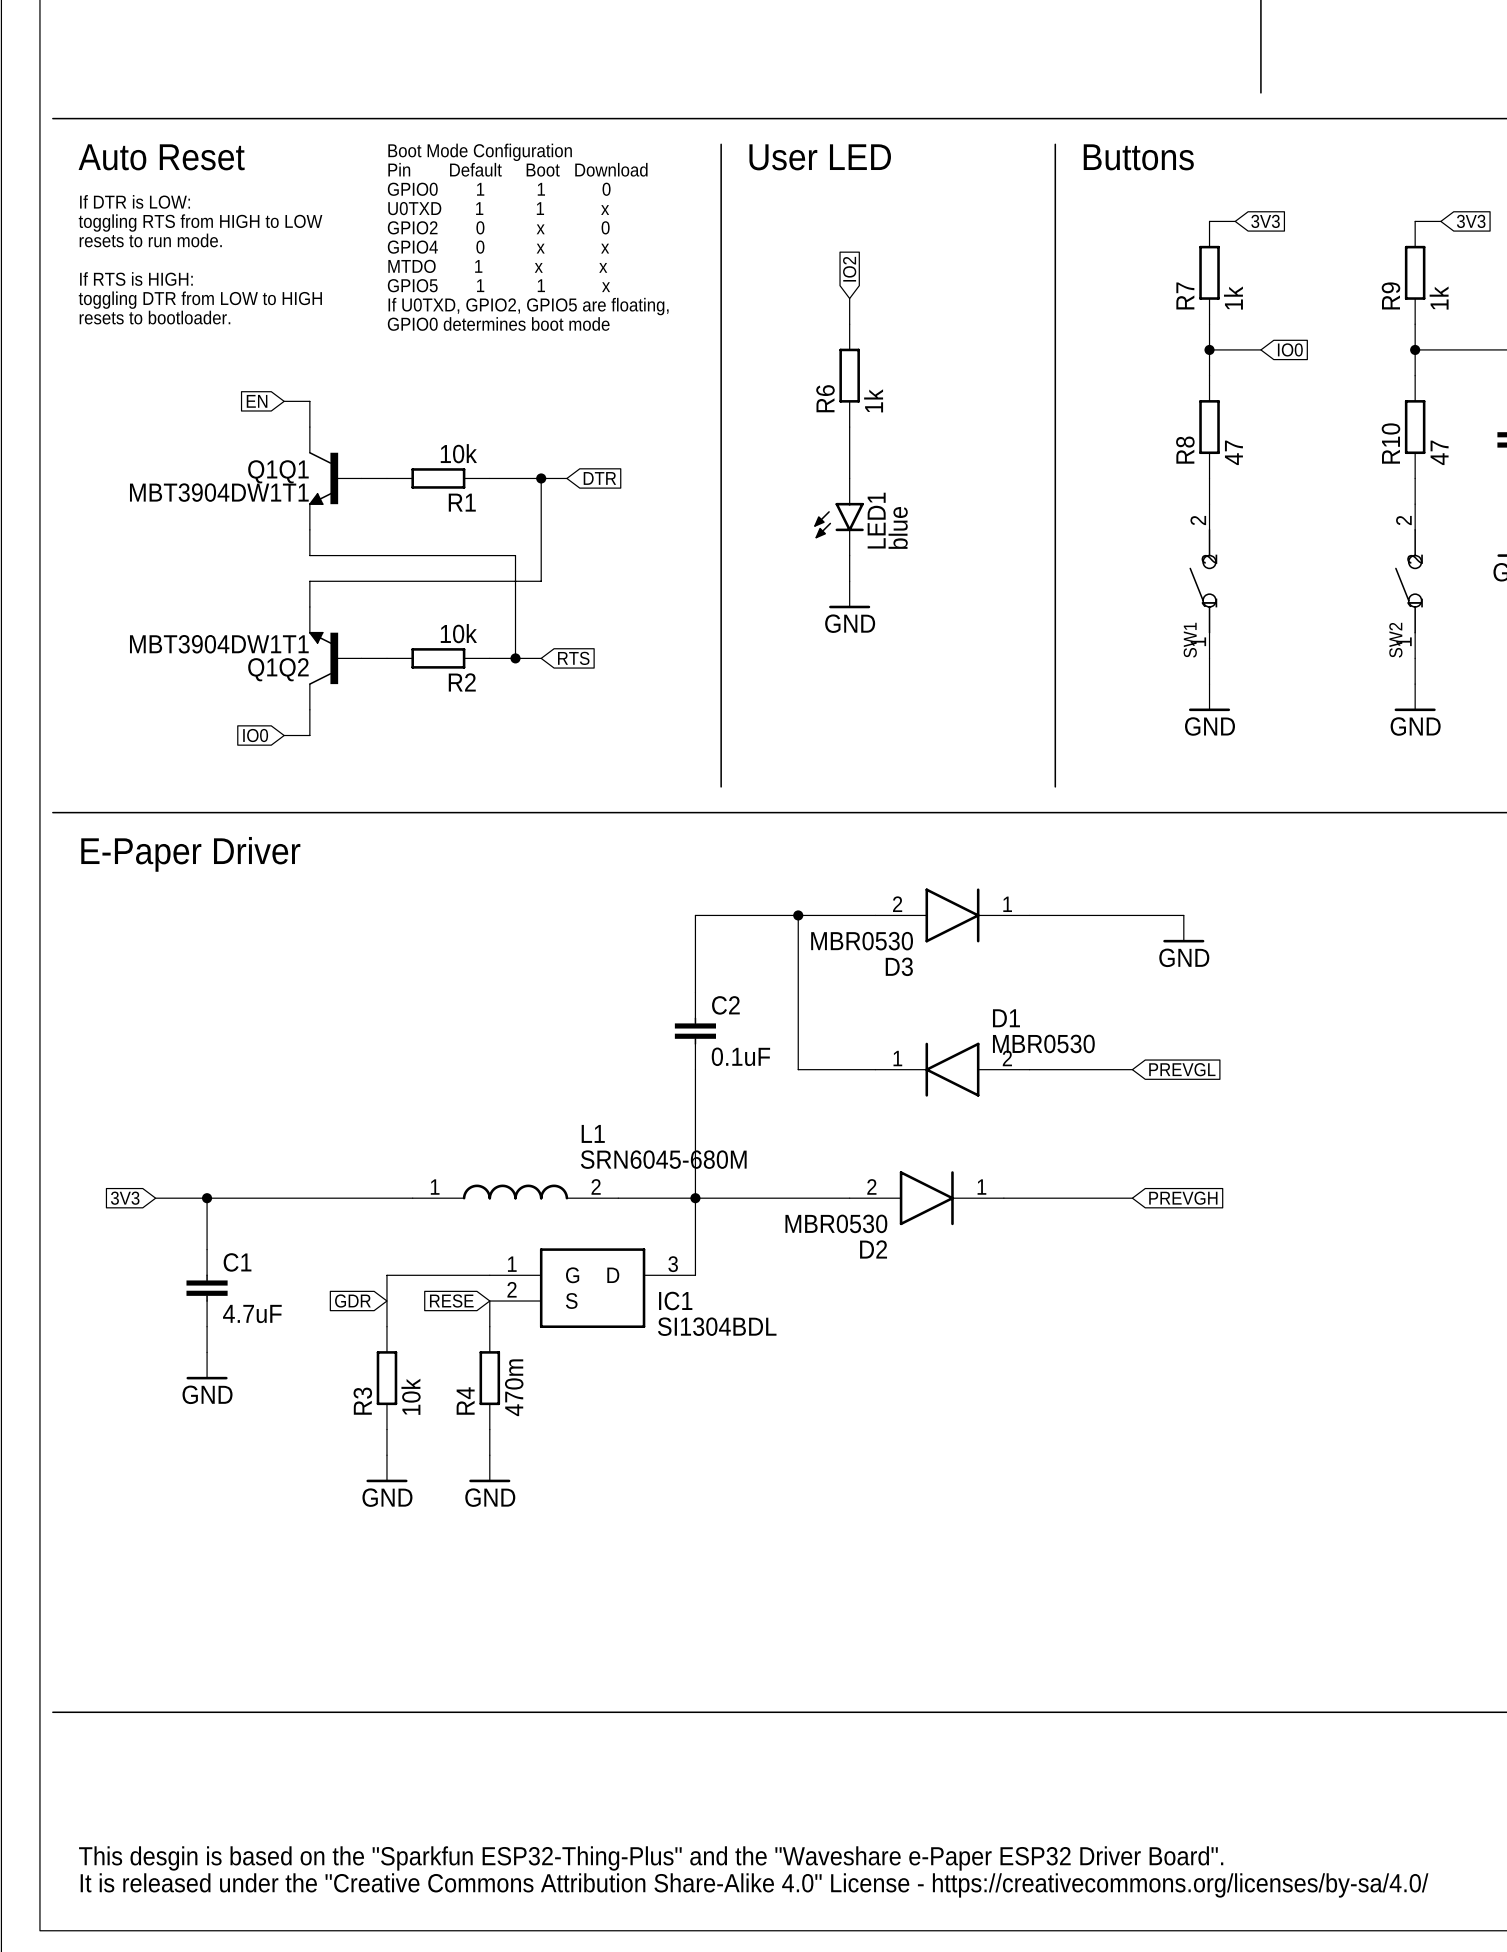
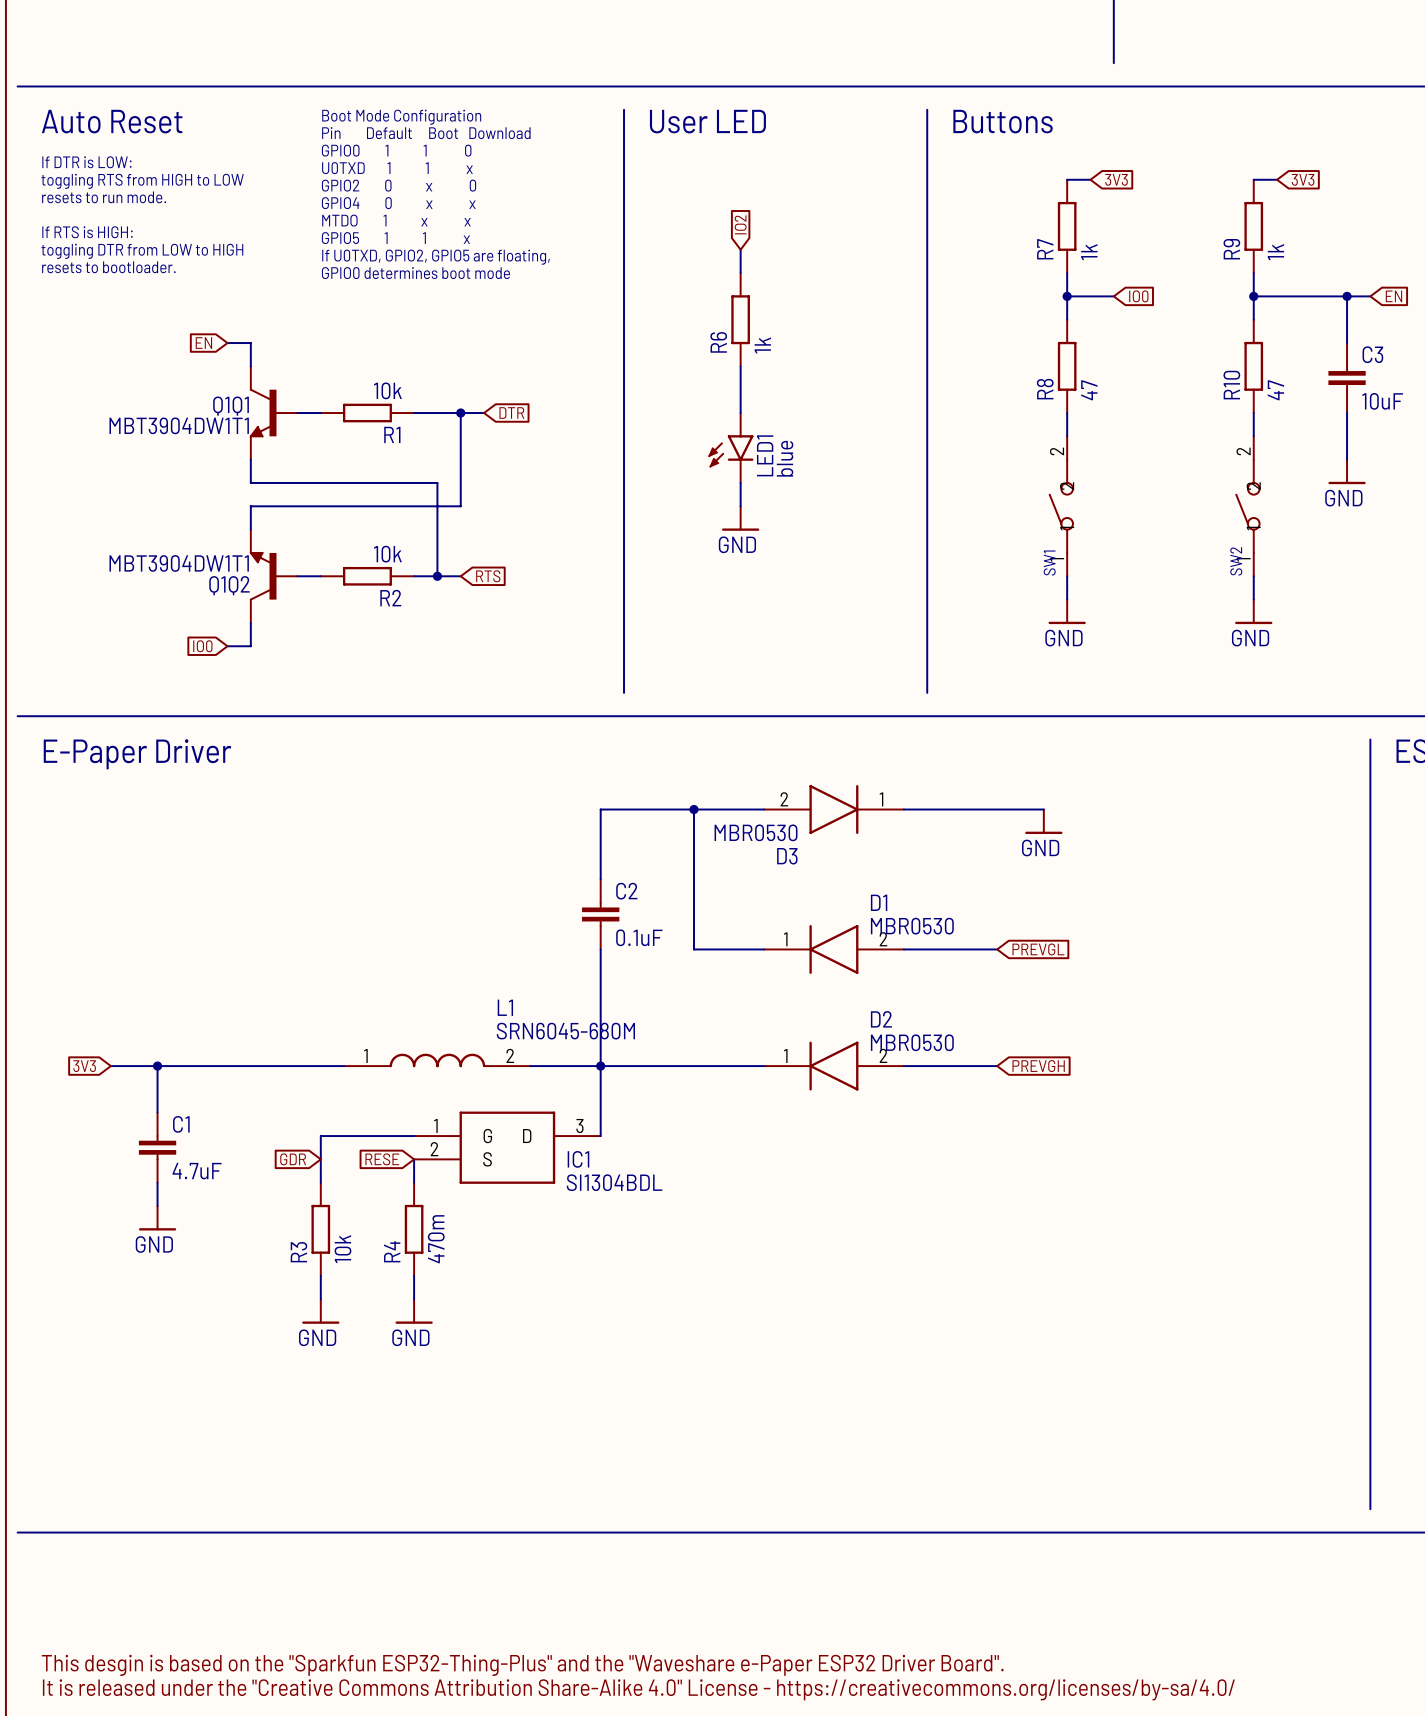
D2 rotation: 0° (926, 1198) -> 180° (833, 1066)

